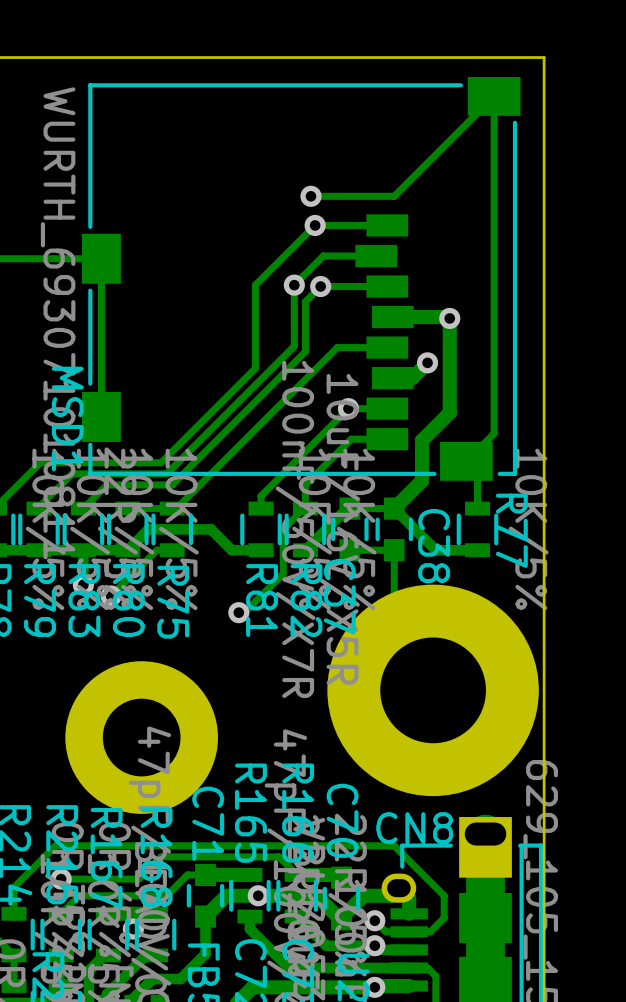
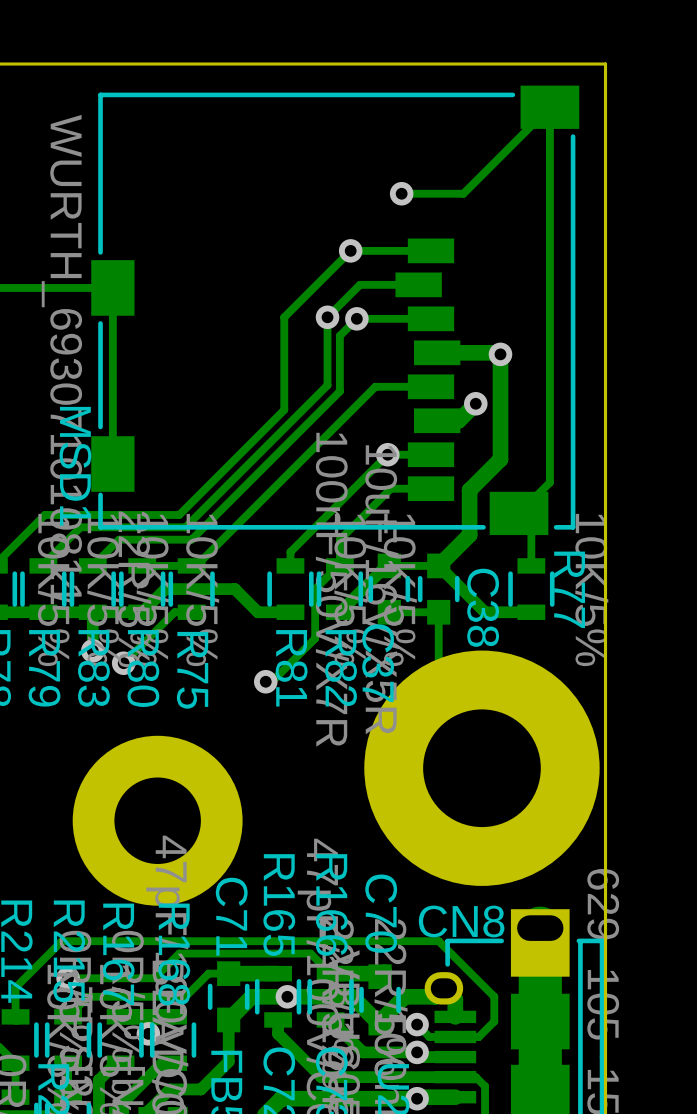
track: (416, 174) (394, 196) (310, 196) -> (463, 193) (401, 193)
via position: (310, 196) -> (401, 193)

